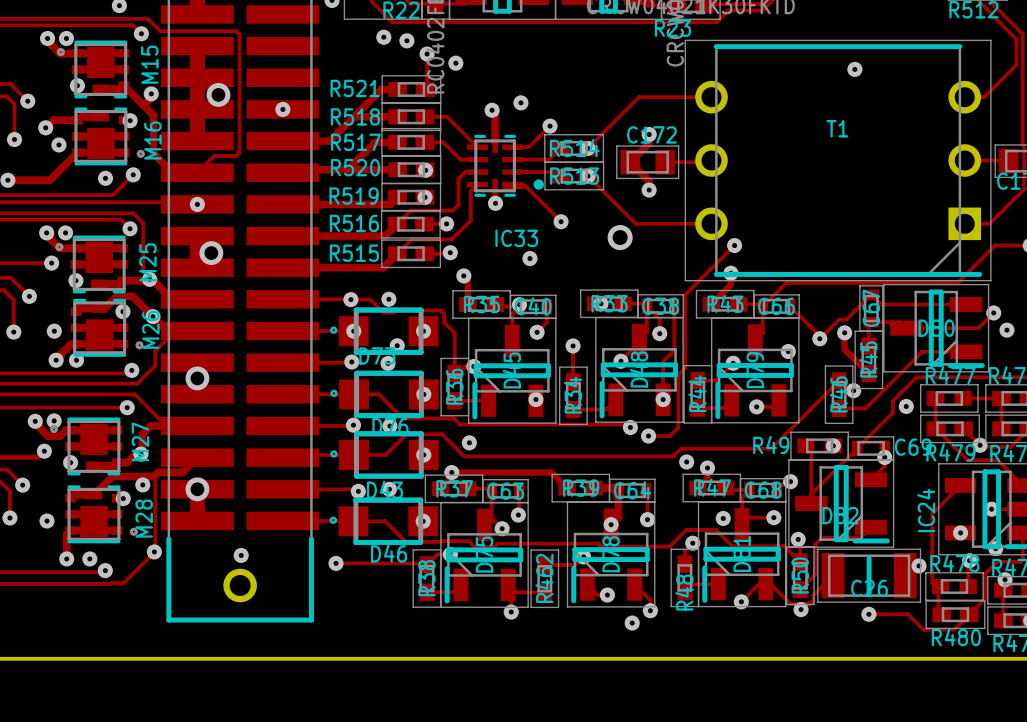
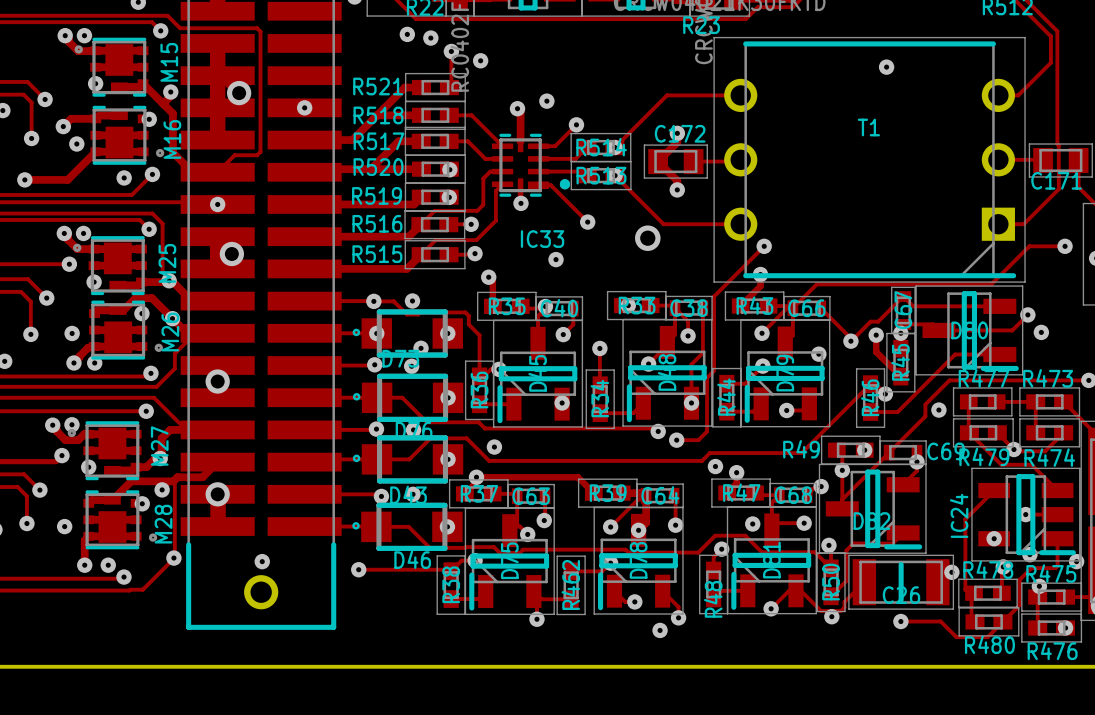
track: none -> (792, 308) (787, 308) (762, 333)
via: none -> (762, 333)
via: none -> (900, 333)
via: none -> (842, 470)
track: none -> (646, 499) (638, 499) (610, 527)
via: none -> (610, 527)

